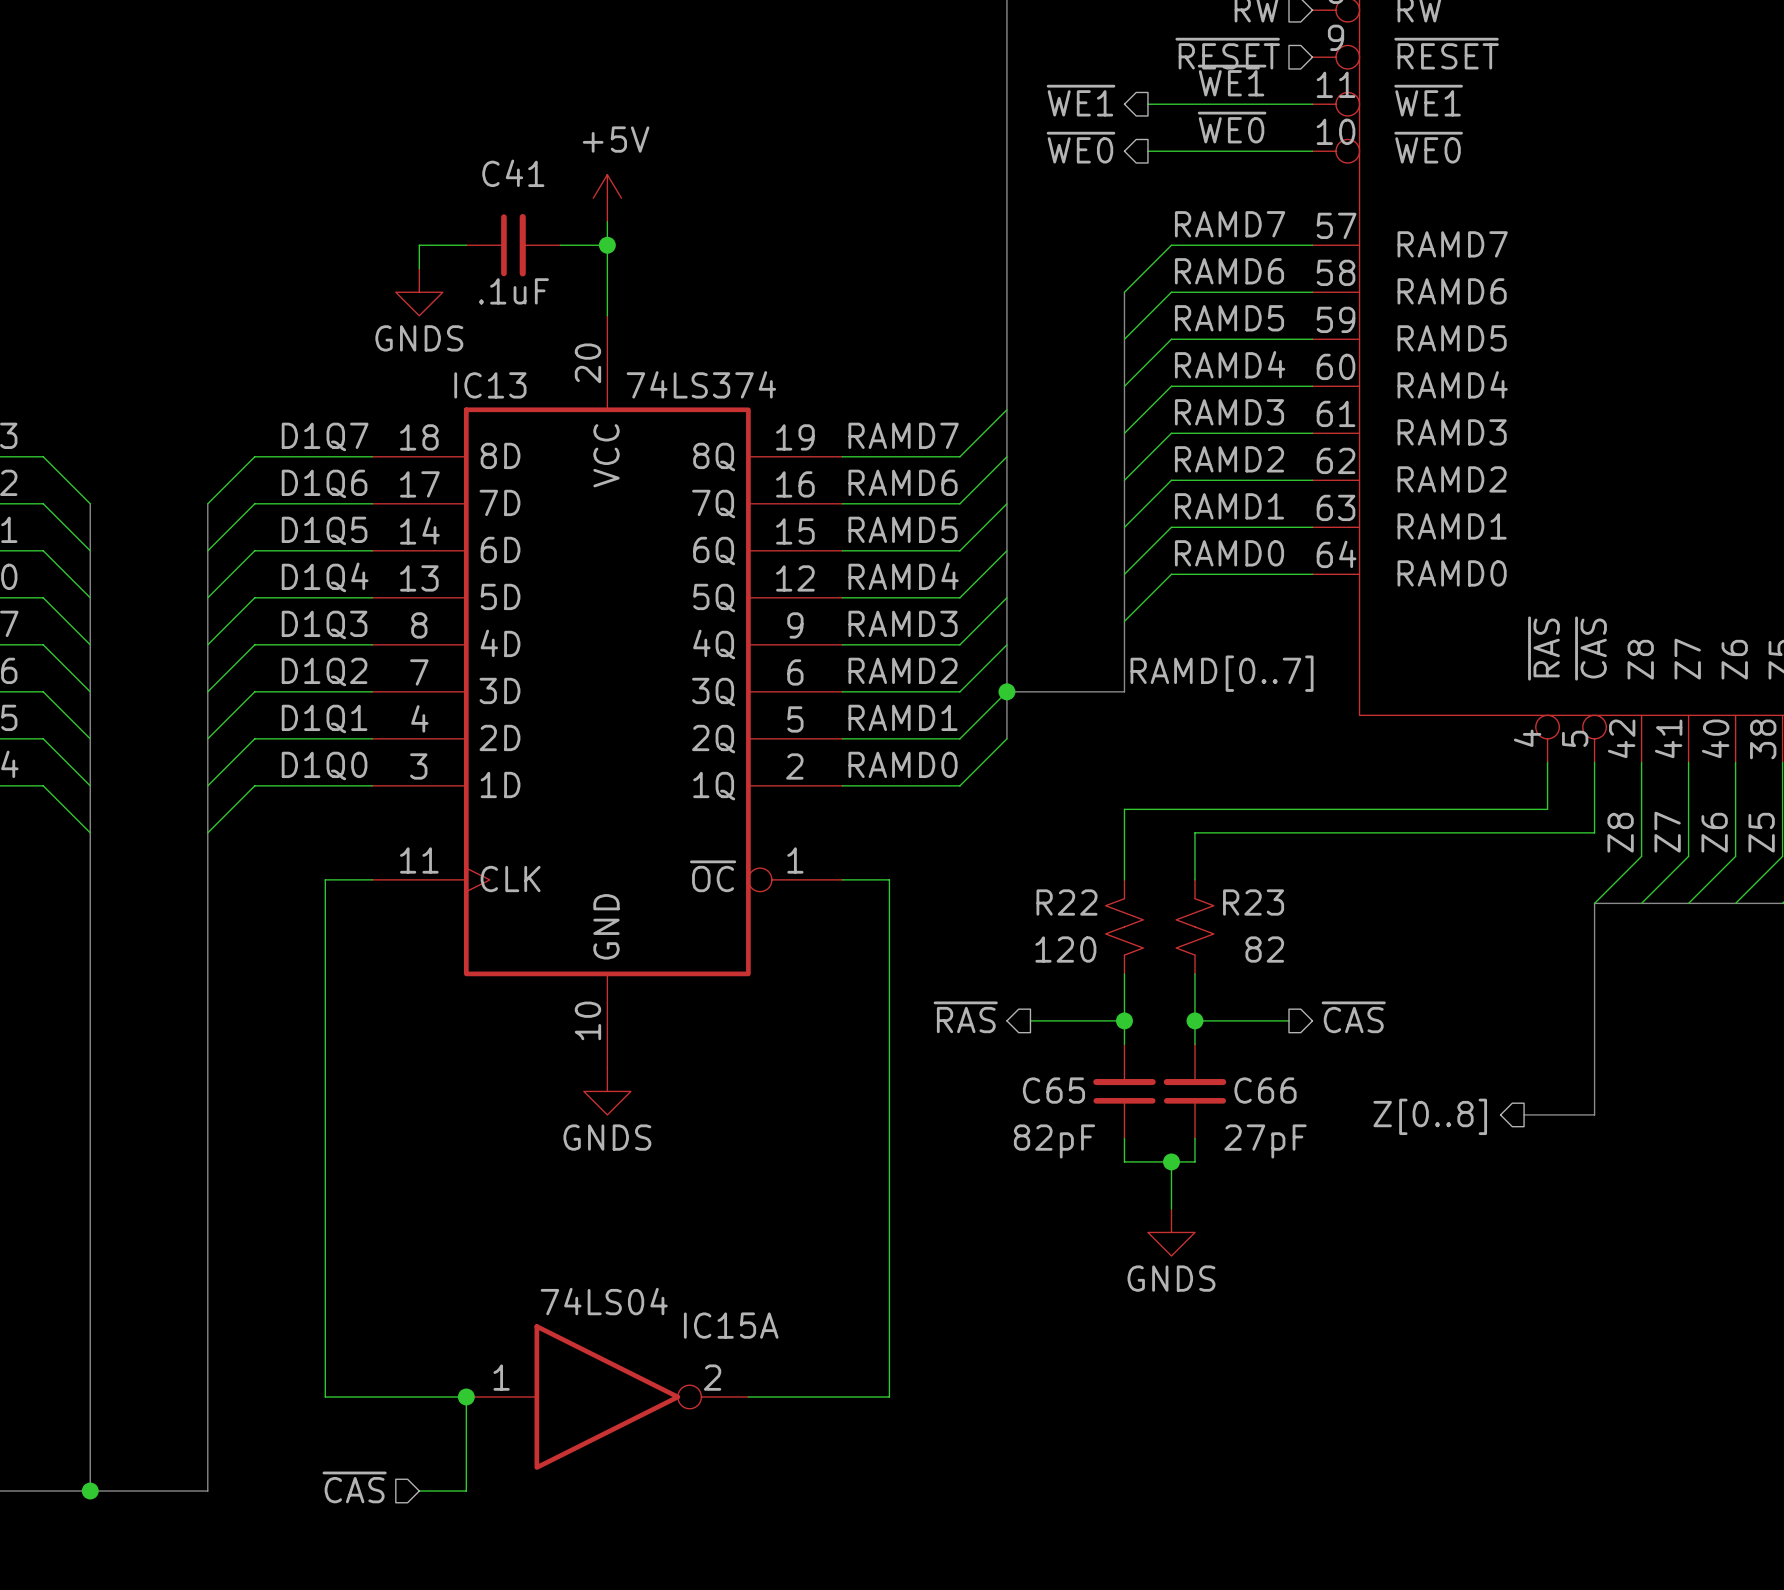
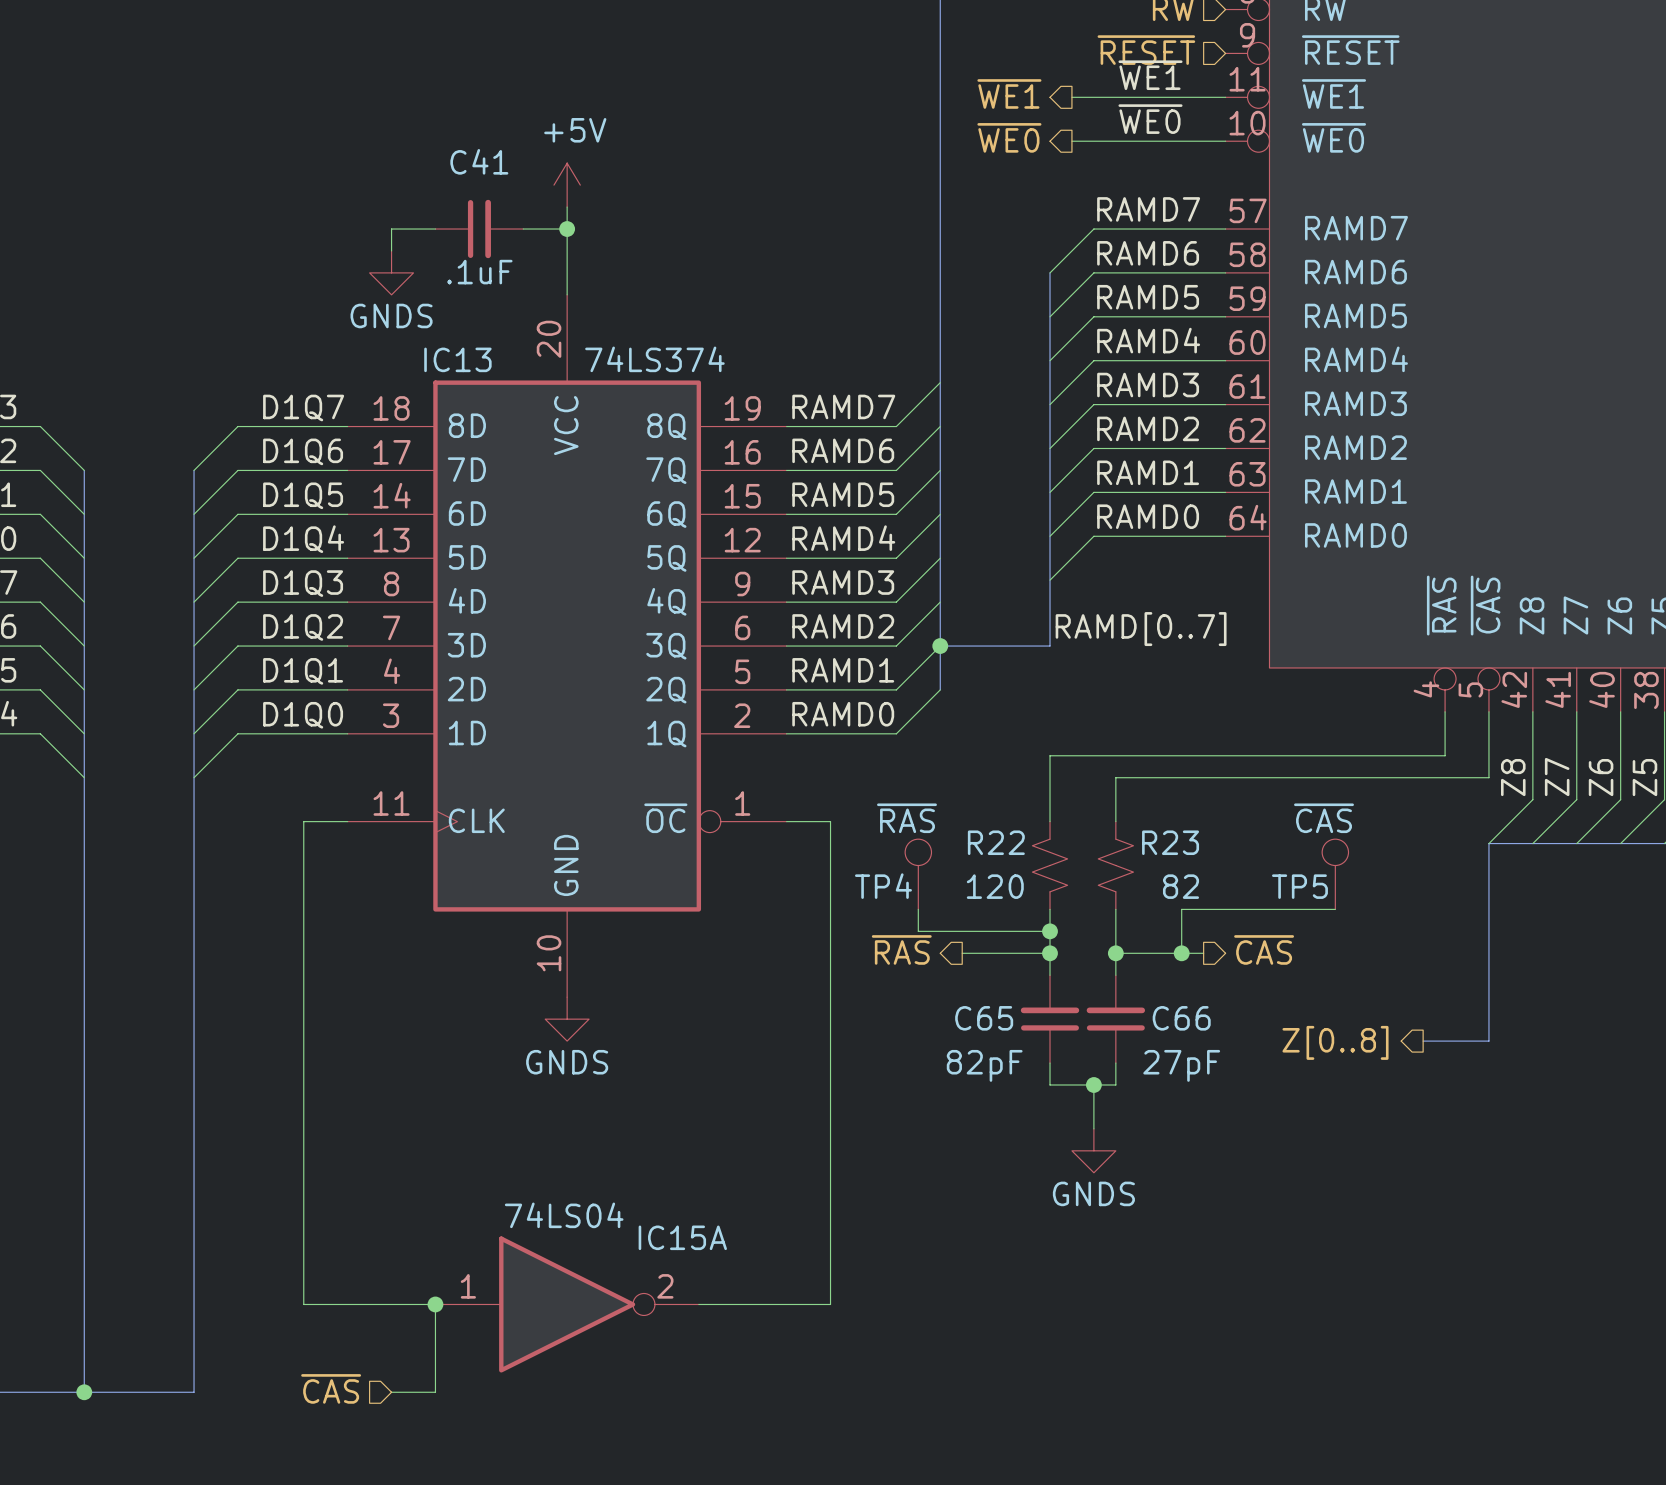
TP4: none -> ~{RAS} (918, 874)
TP5: none -> ~{CAS} (1335, 874)
wire: none -> (918, 909) (918, 931) (1050, 931)
wire: none -> (1335, 909) (1181, 909) (1181, 953)
junction: none -> (1050, 931)
junction: none -> (1181, 953)

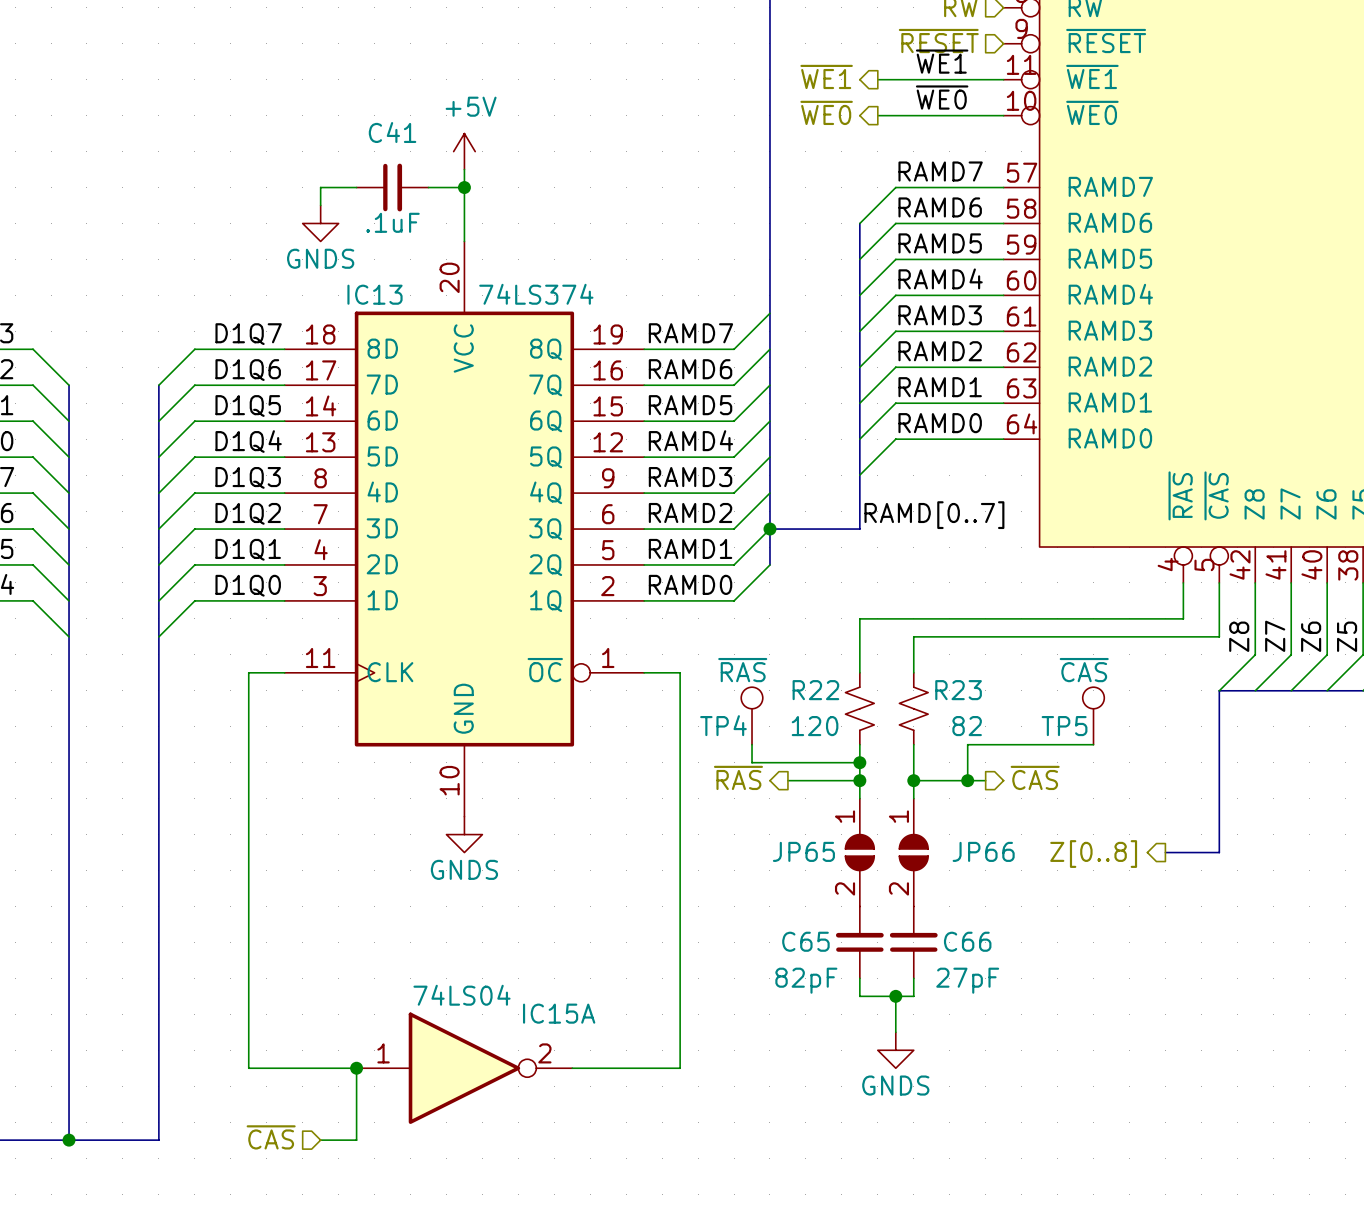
C65 position: (1050, 1019) -> (859, 942)
C66 position: (1115, 1019) -> (913, 942)
JP65: none -> (859, 852)
JP66: none -> (913, 852)
wire: (1050, 1063) (1050, 1084) (1115, 1084) (1115, 1063) -> (859, 978) (859, 996) (913, 996) (913, 978)
wire: (1093, 1084) (1093, 1128) -> (895, 996) (895, 1032)
junction: (1093, 1084) -> none
power symbol position: GNDS (1093, 1150) -> GNDS (895, 1050)
junction: none -> (895, 996)

